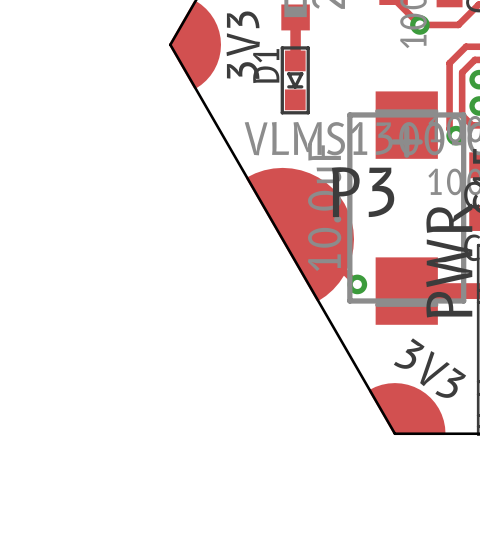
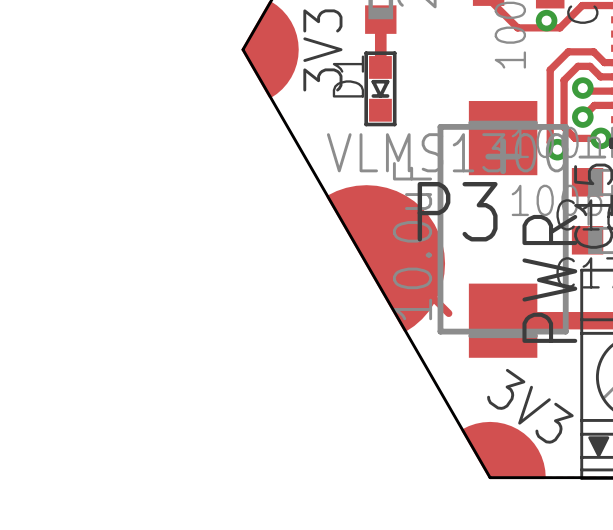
via position: (419, 24) -> (546, 20)
via: (357, 284) -> none

